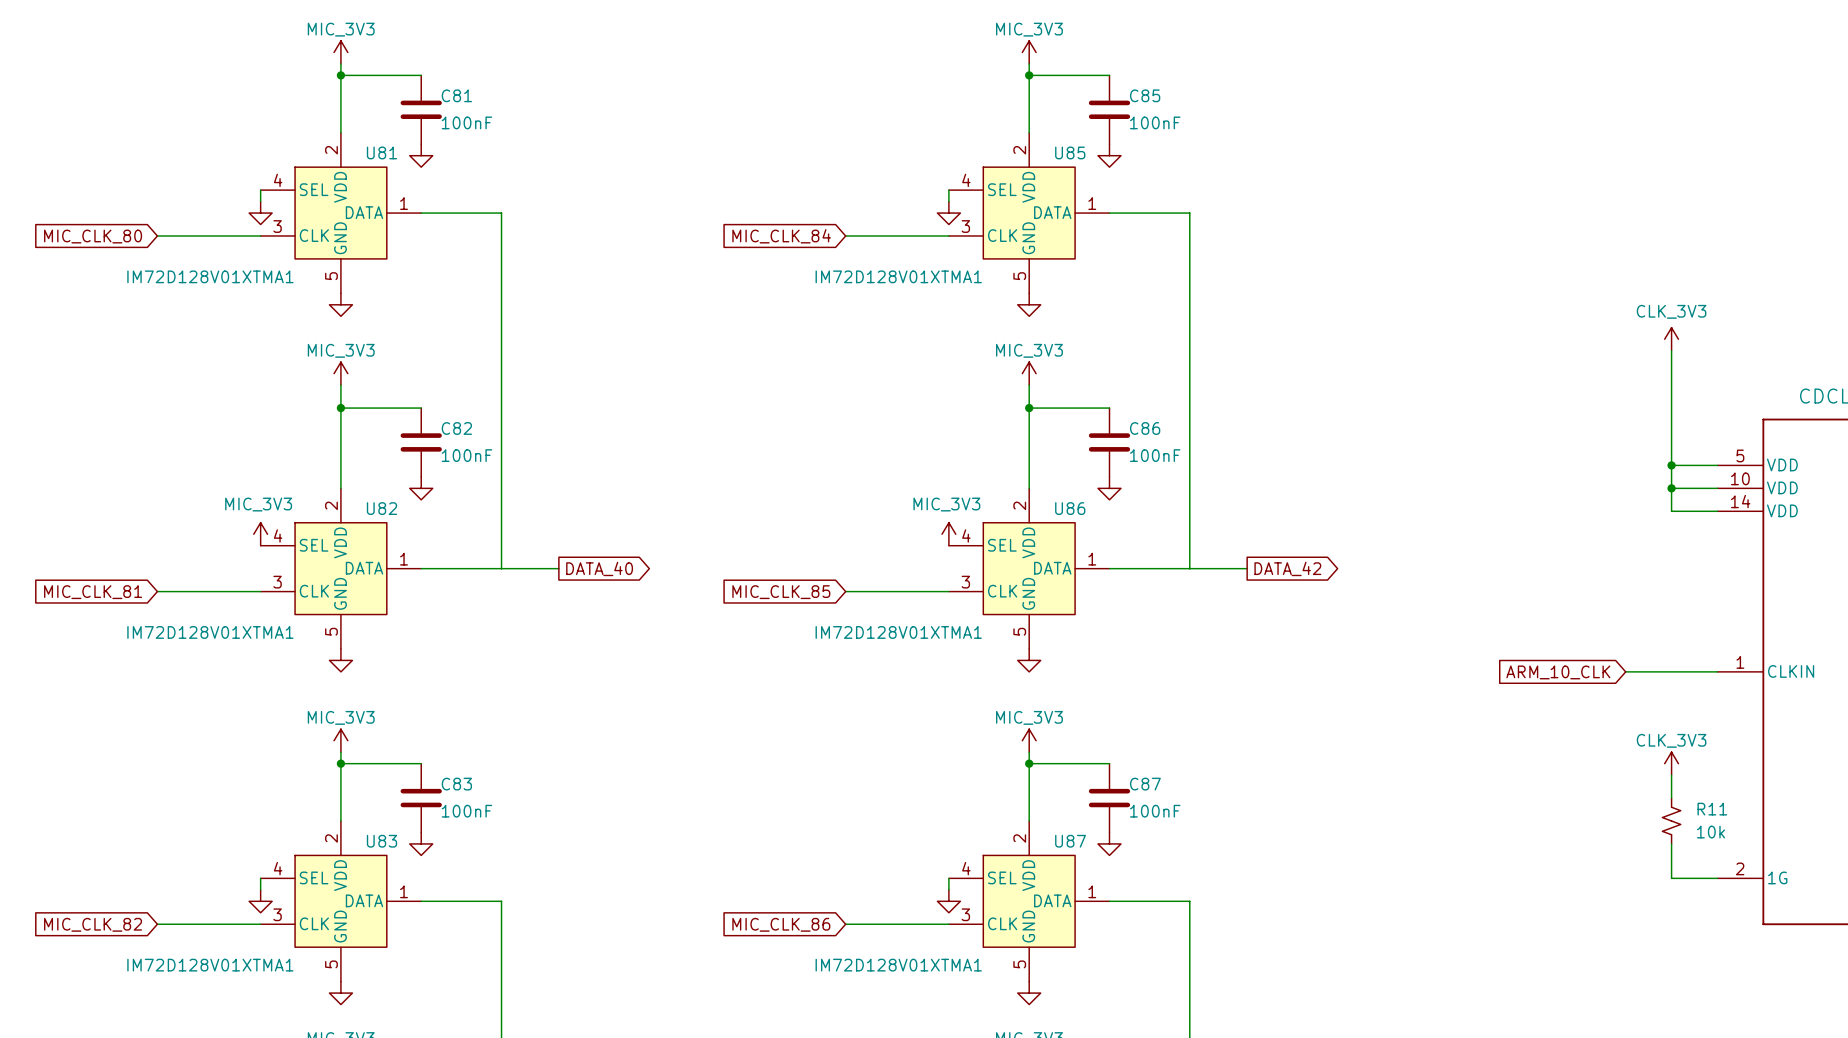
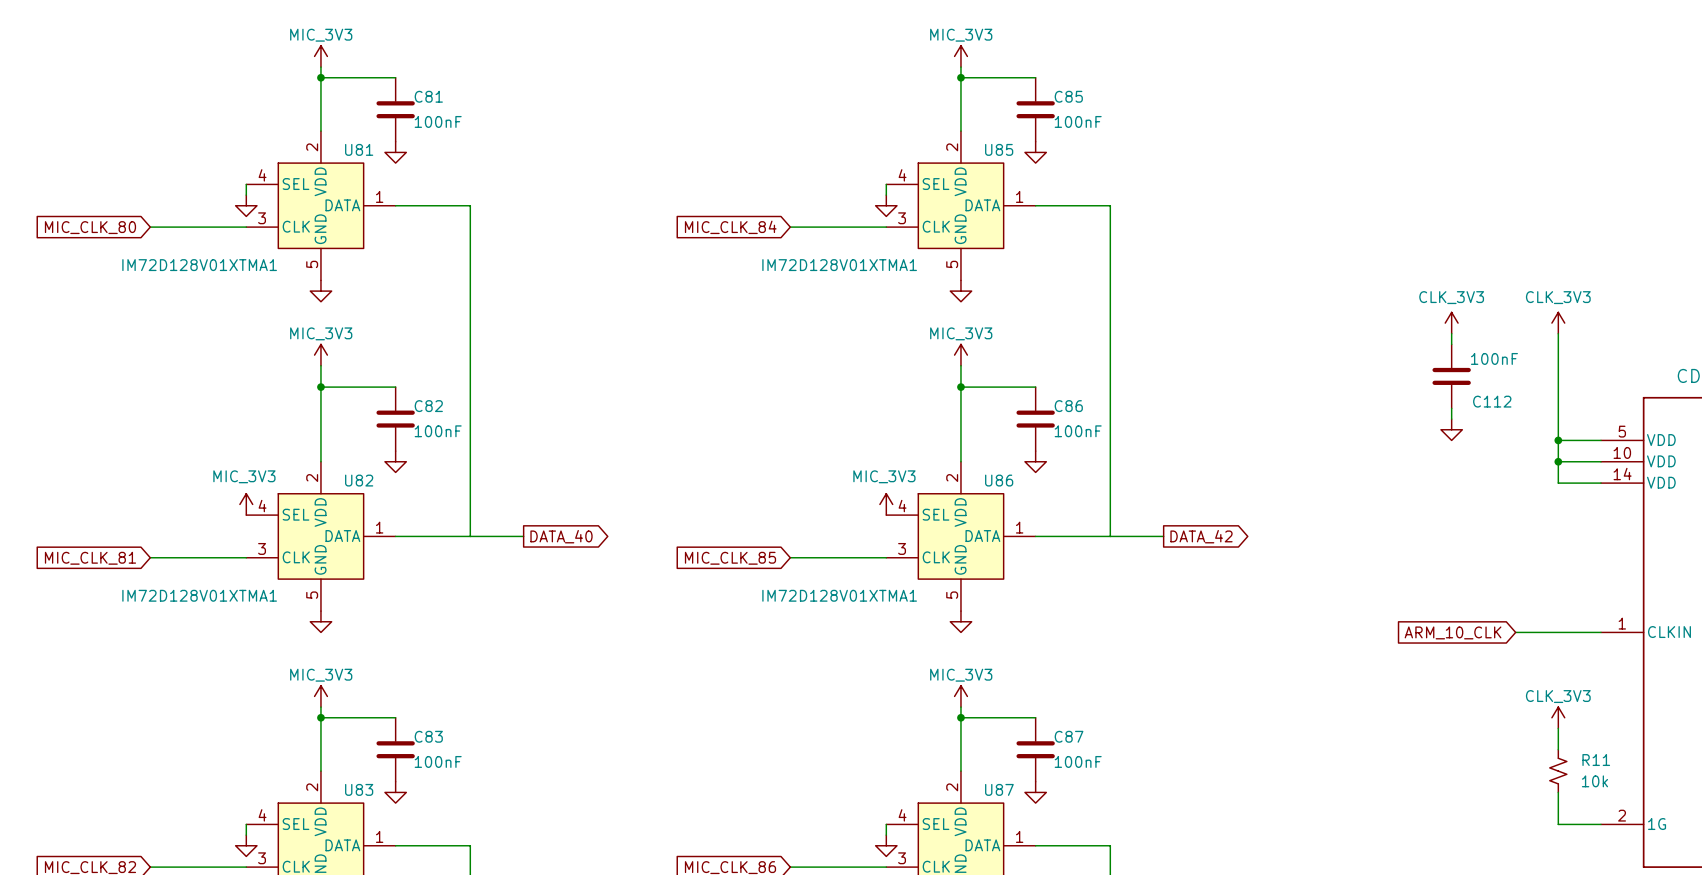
power symbol: none -> CLK_3V3 (1451, 323)
wire: none -> (1451, 333) (1451, 344)
C112: none -> 100nF (1451, 376)
wire: none -> (1451, 408) (1451, 419)
power symbol: none -> (1451, 429)

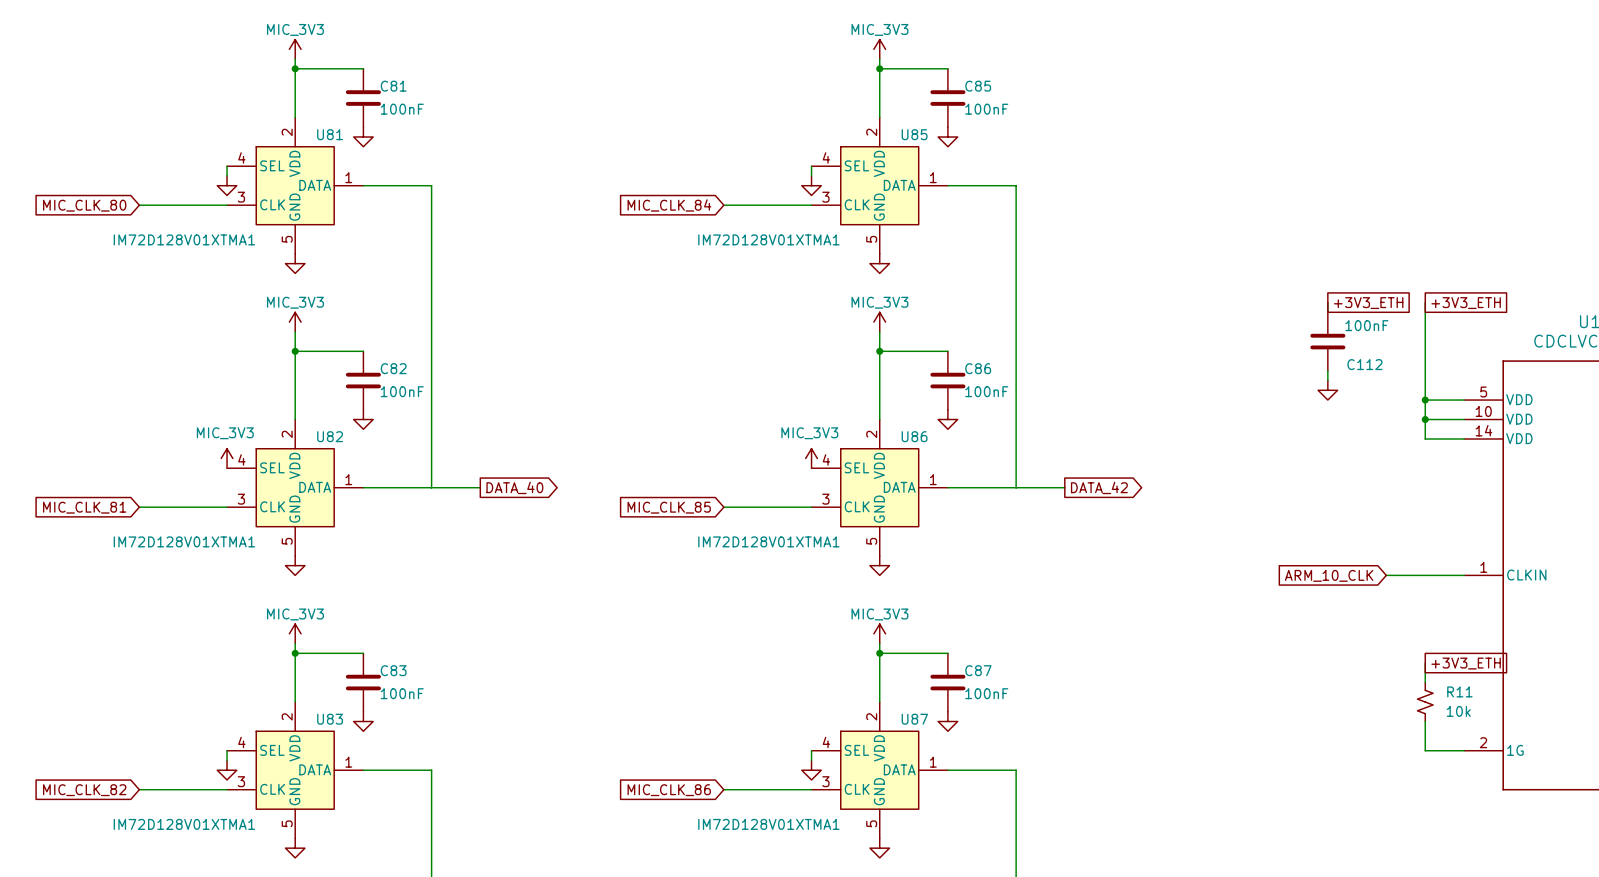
power symbol: CLK_3V3 (1451, 323) -> none
power symbol: CLK_3V3 (1558, 323) -> none
global label: none -> +3V3_ETH (1368, 303)
global label: none -> +3V3_ETH (1466, 303)
power symbol: CLK_3V3 (1558, 717) -> none
global label: none -> +3V3_ETH (1466, 663)

